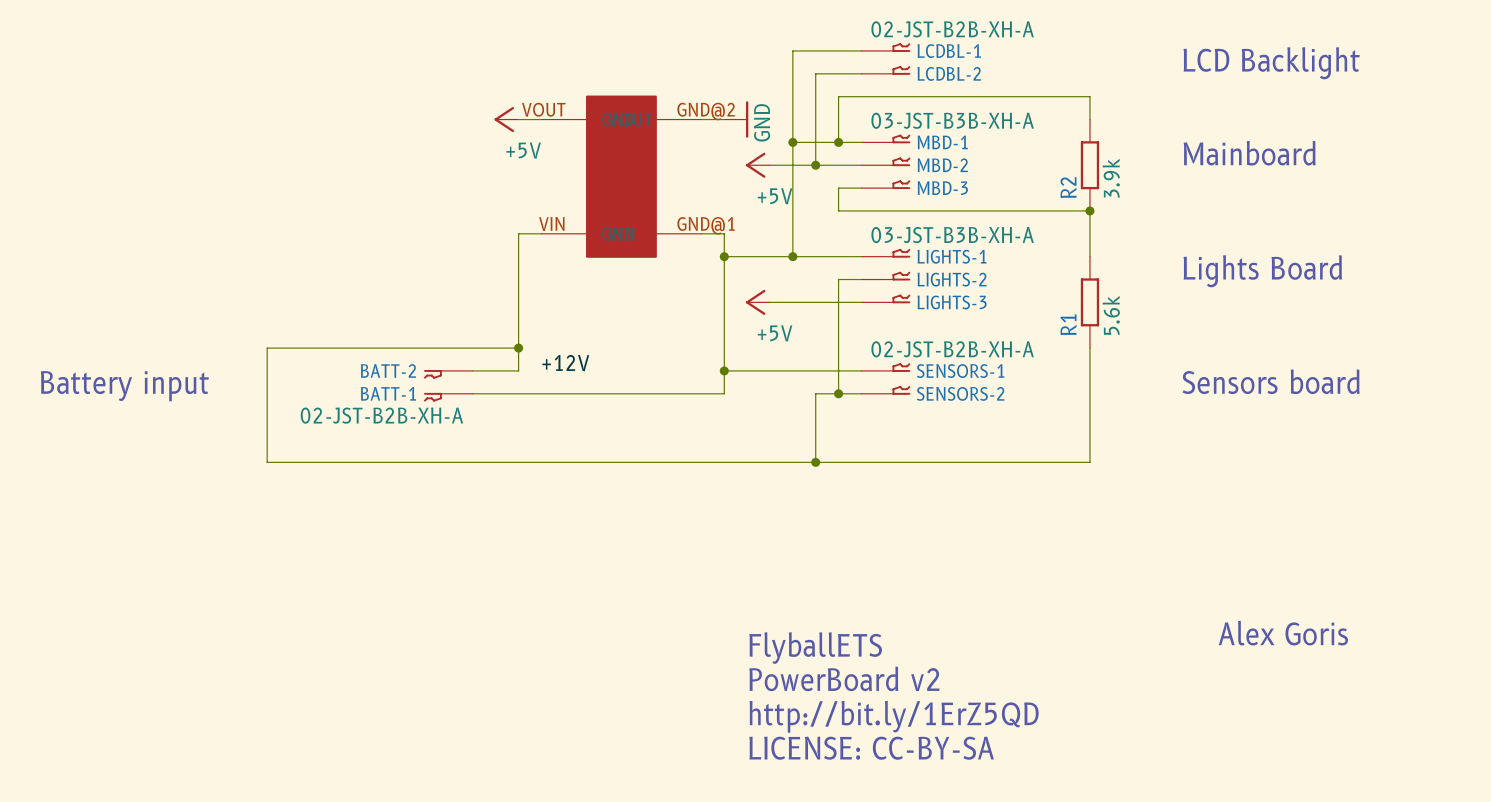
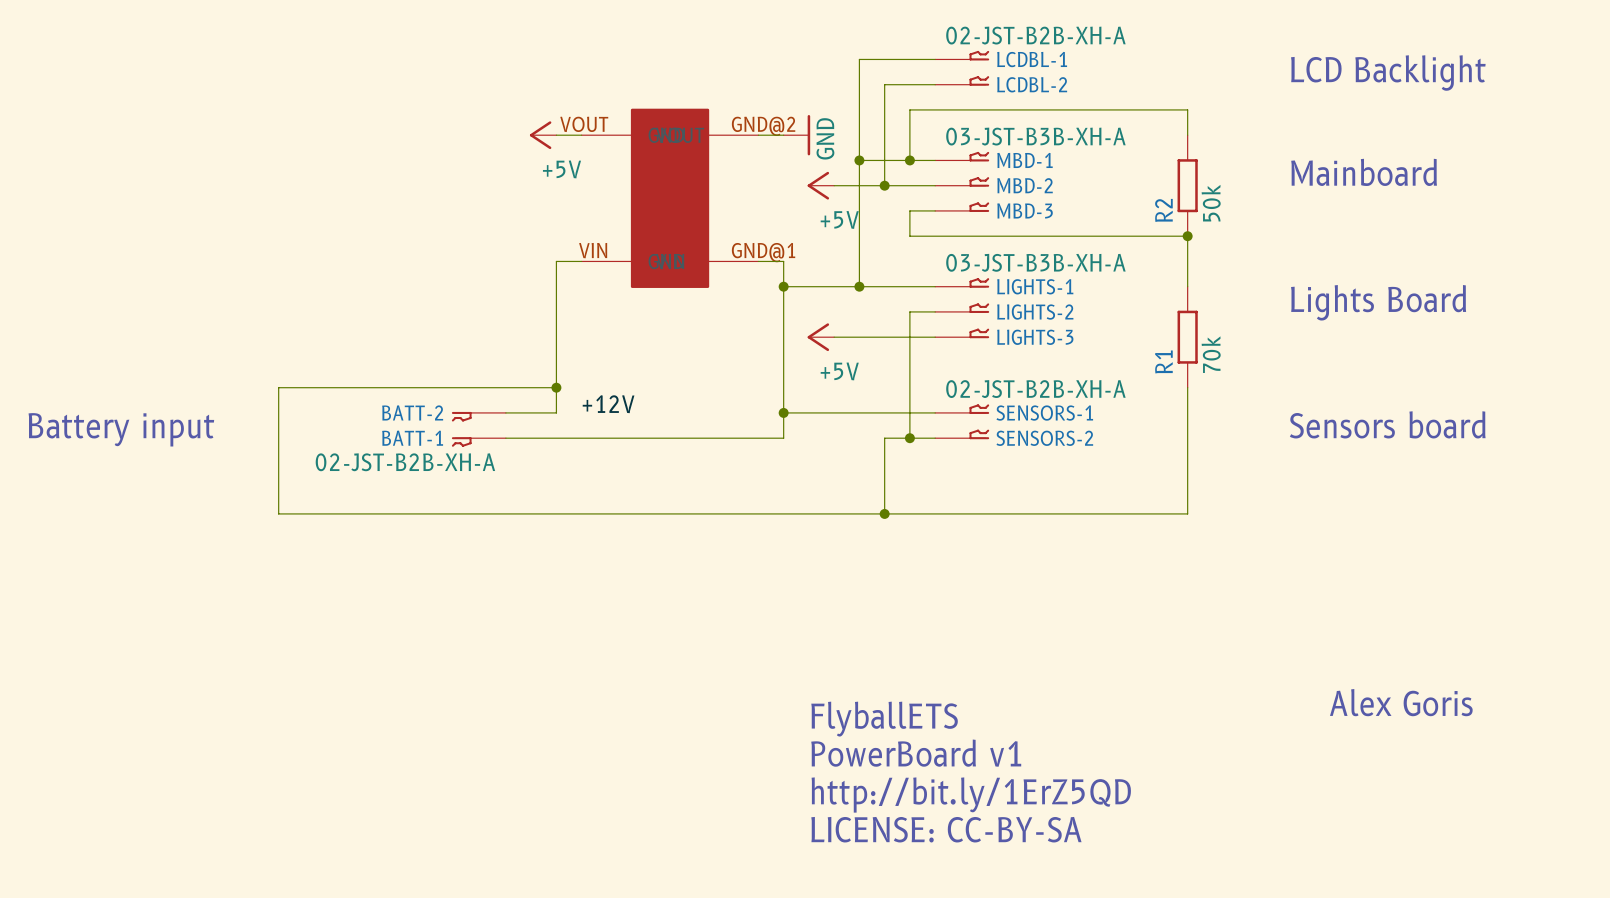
R2 value: 3.9k (1111, 178) -> 50k (1211, 203)
R1 value: 5.6k (1111, 315) -> 70k (1211, 354)
text: PowerBoard v2 (844, 678) -> PowerBoard v1 (916, 753)

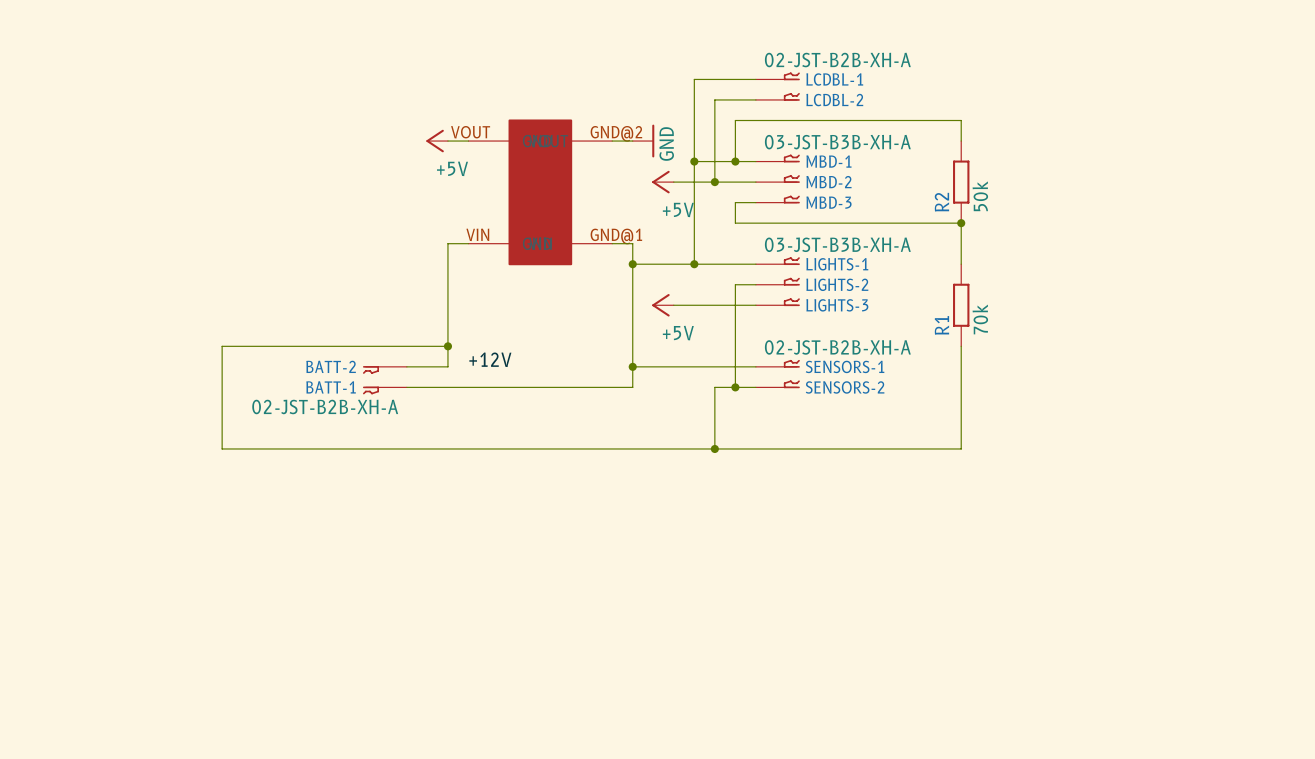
text: LCD Backlight (1388, 73) -> none
text: Mainboard (1364, 172) -> none
text: Lights Board (1378, 302) -> none
text: Sensors board (1387, 424) -> none
text: Battery input (121, 429) -> none
text: Alex Goris (1401, 702) -> none
text: FlyballETS (884, 719) -> none
text: PowerBoard v1 (916, 753) -> none
text: http://bit.ly/1ErZ5QD (971, 795) -> none
text: LICENSE: CC-BY-SA (946, 829) -> none

